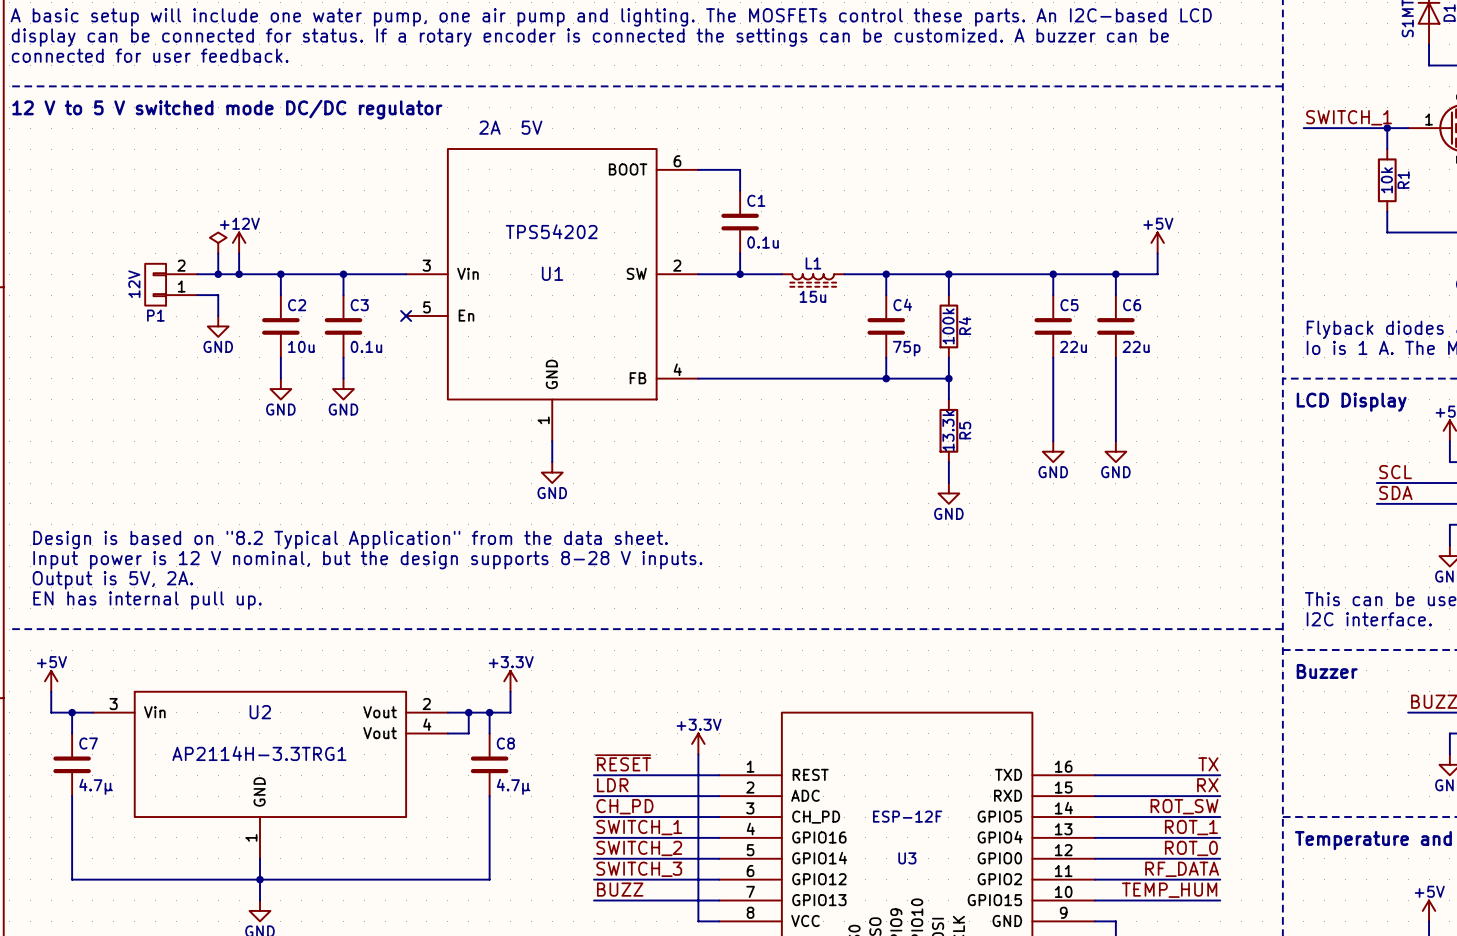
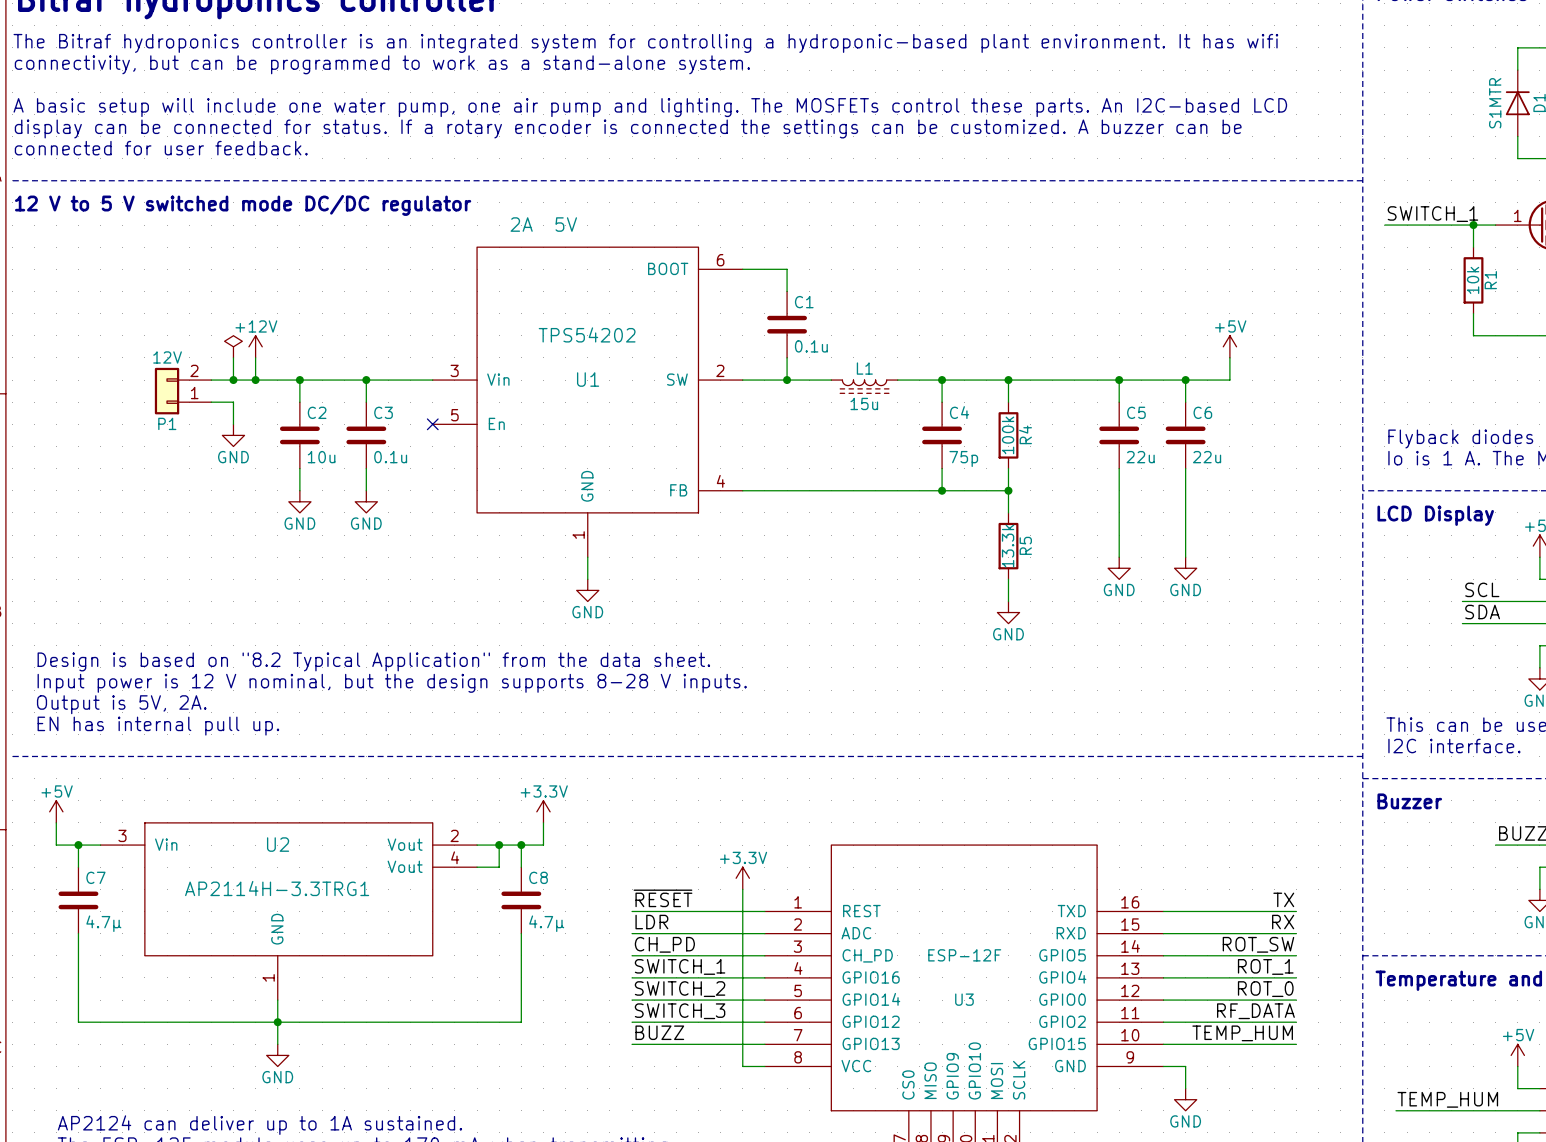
P1 symbol: [145, 263, 198, 306] -> [154, 367, 212, 415]
P1 value position: 12V (134, 284) -> 12V (167, 357)

